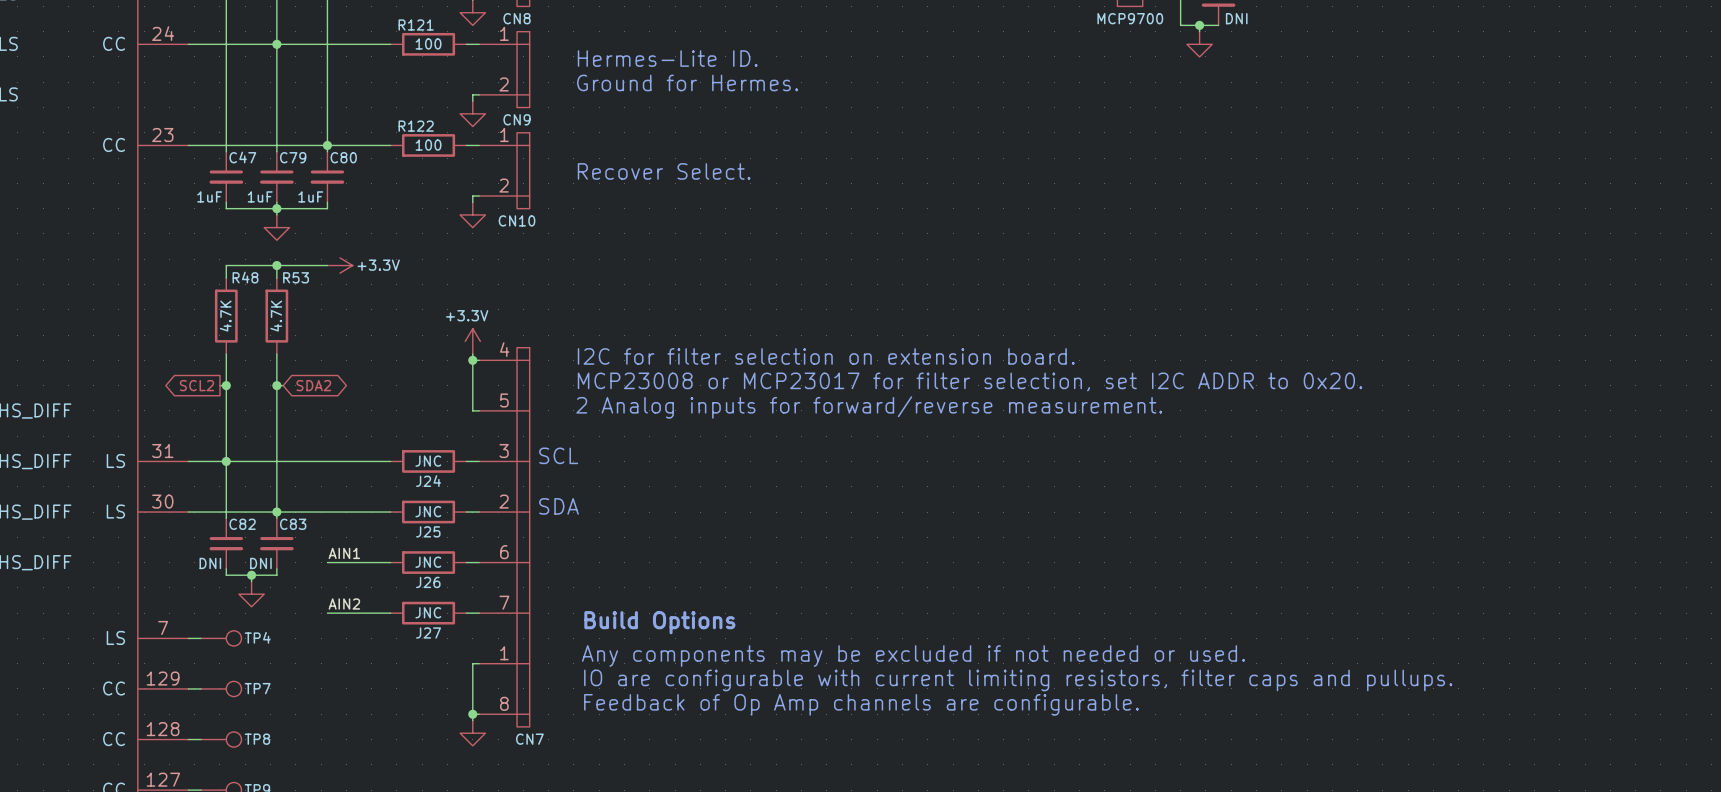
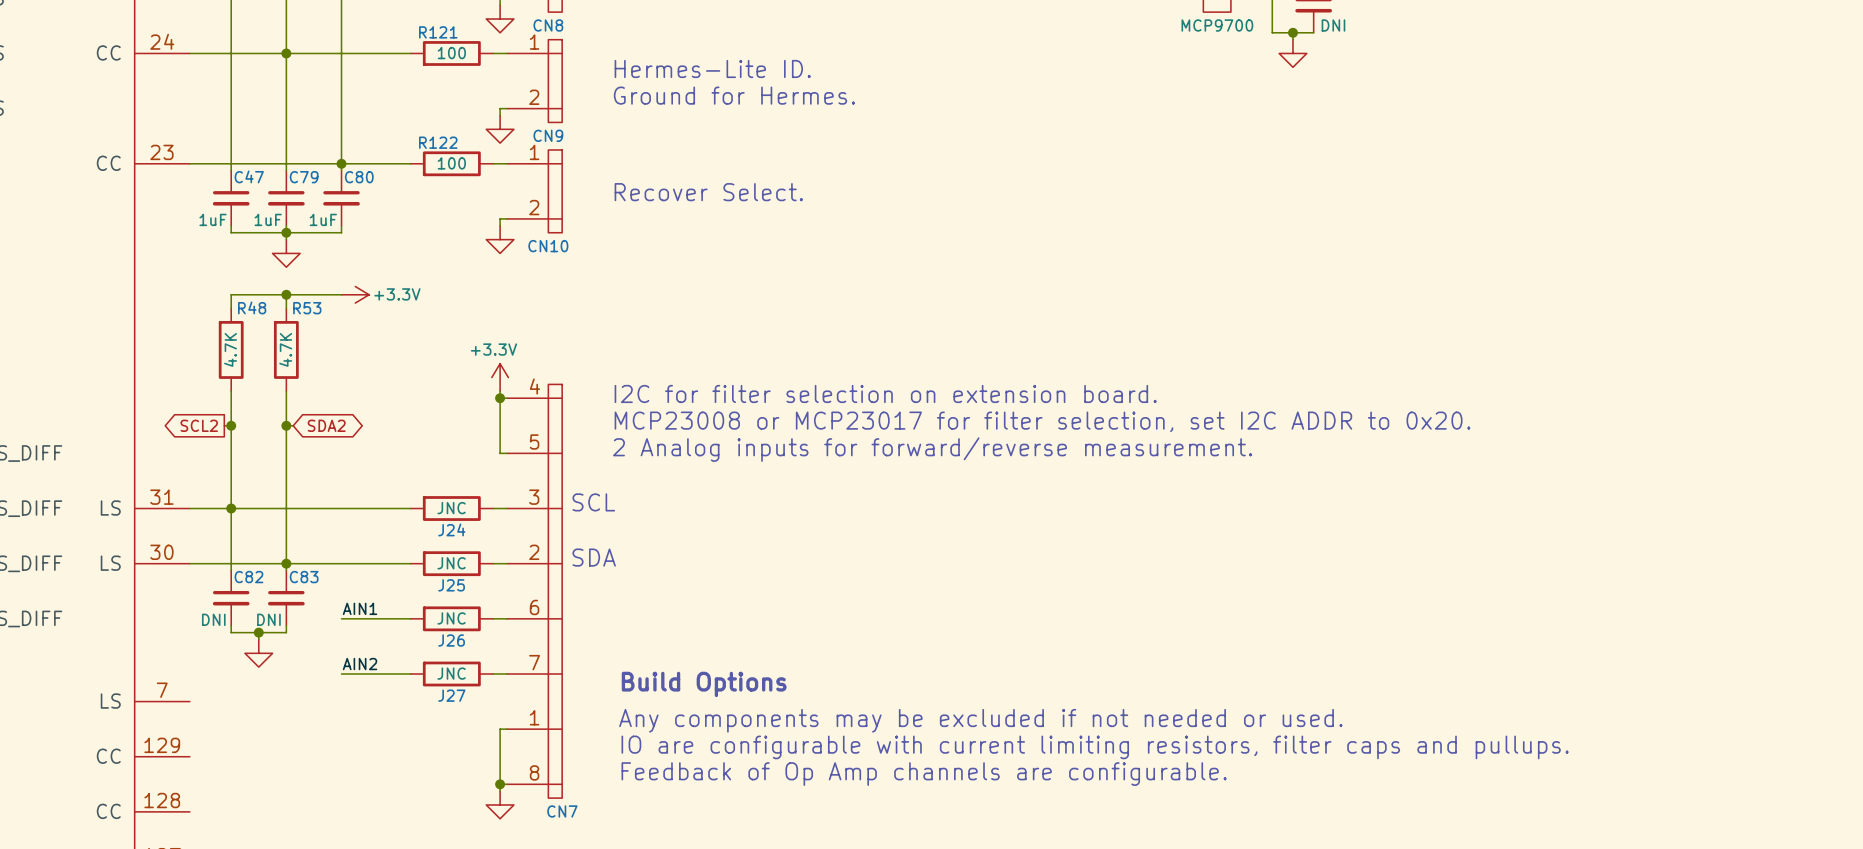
wire: (188, 638) (201, 638) -> none
TP4: (221, 638) -> none
wire: (188, 688) (201, 688) -> none
TP7: (221, 688) -> none
wire: (188, 739) (201, 739) -> none
TP8: (221, 739) -> none

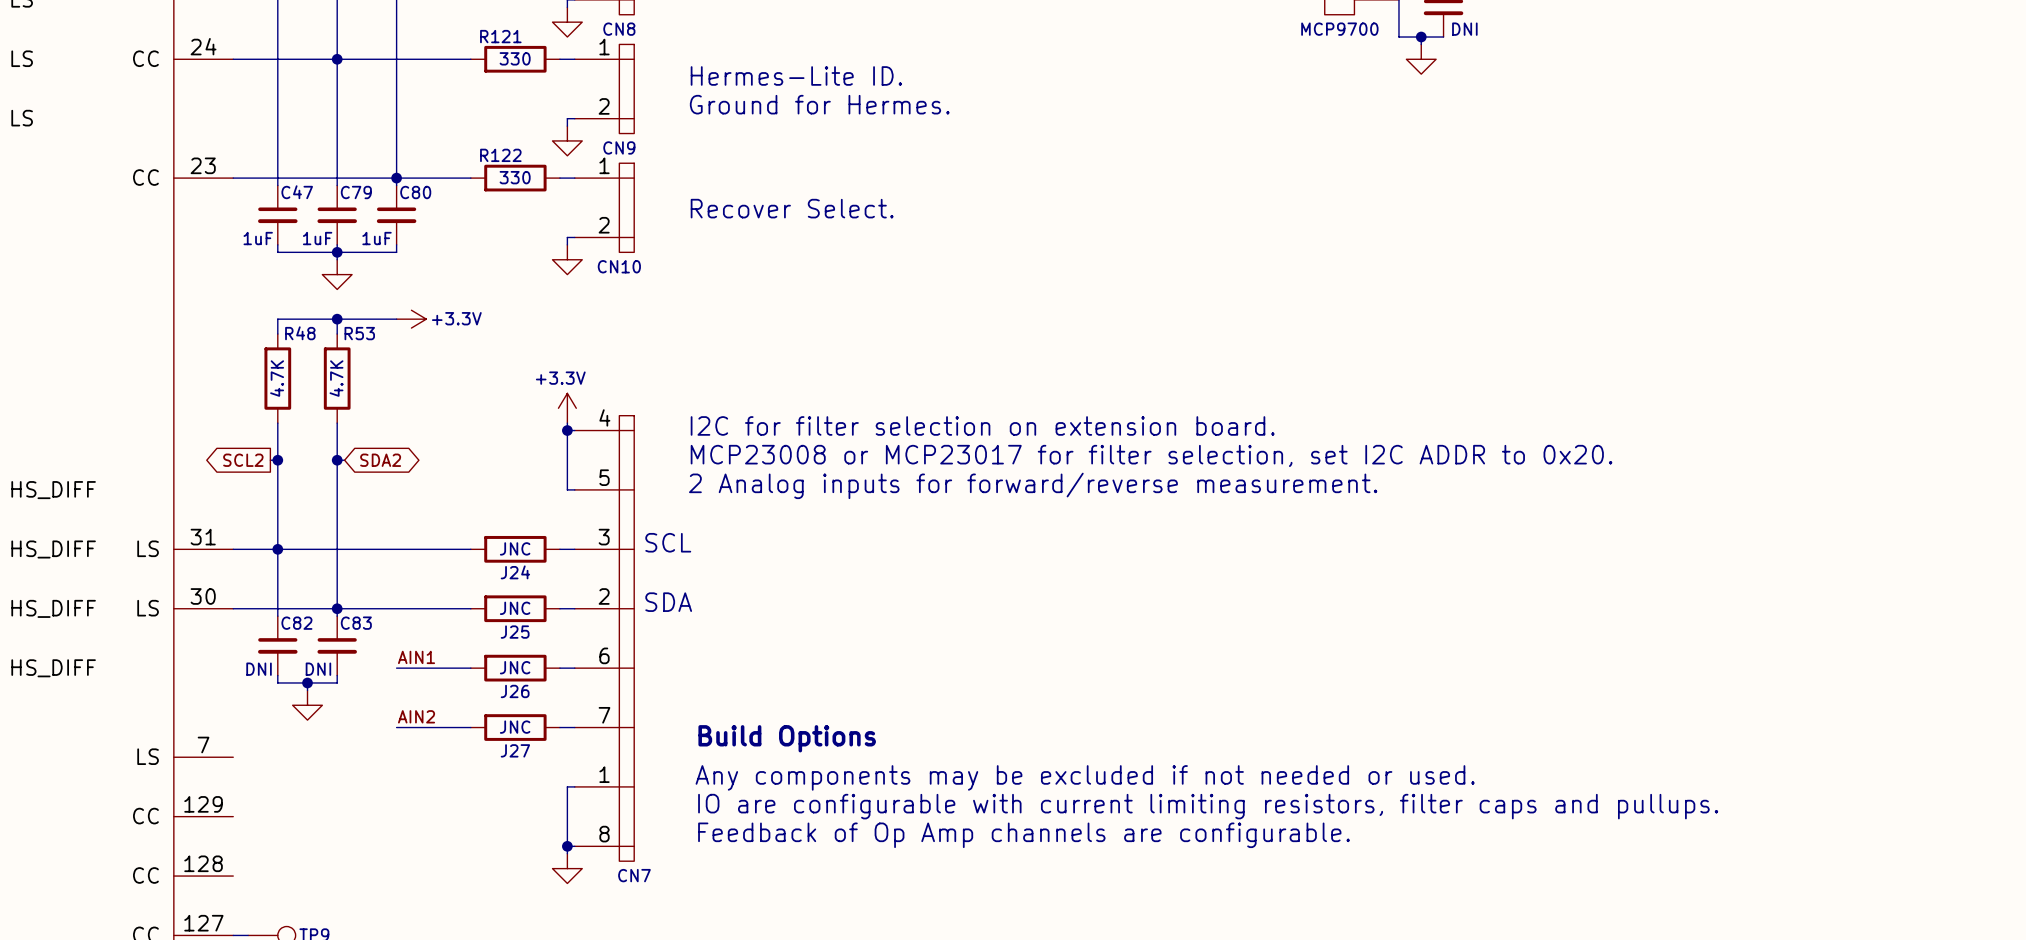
R121 value: 100 (451, 53) -> 330 (515, 58)
R122 value: 100 (451, 163) -> 330 (515, 177)

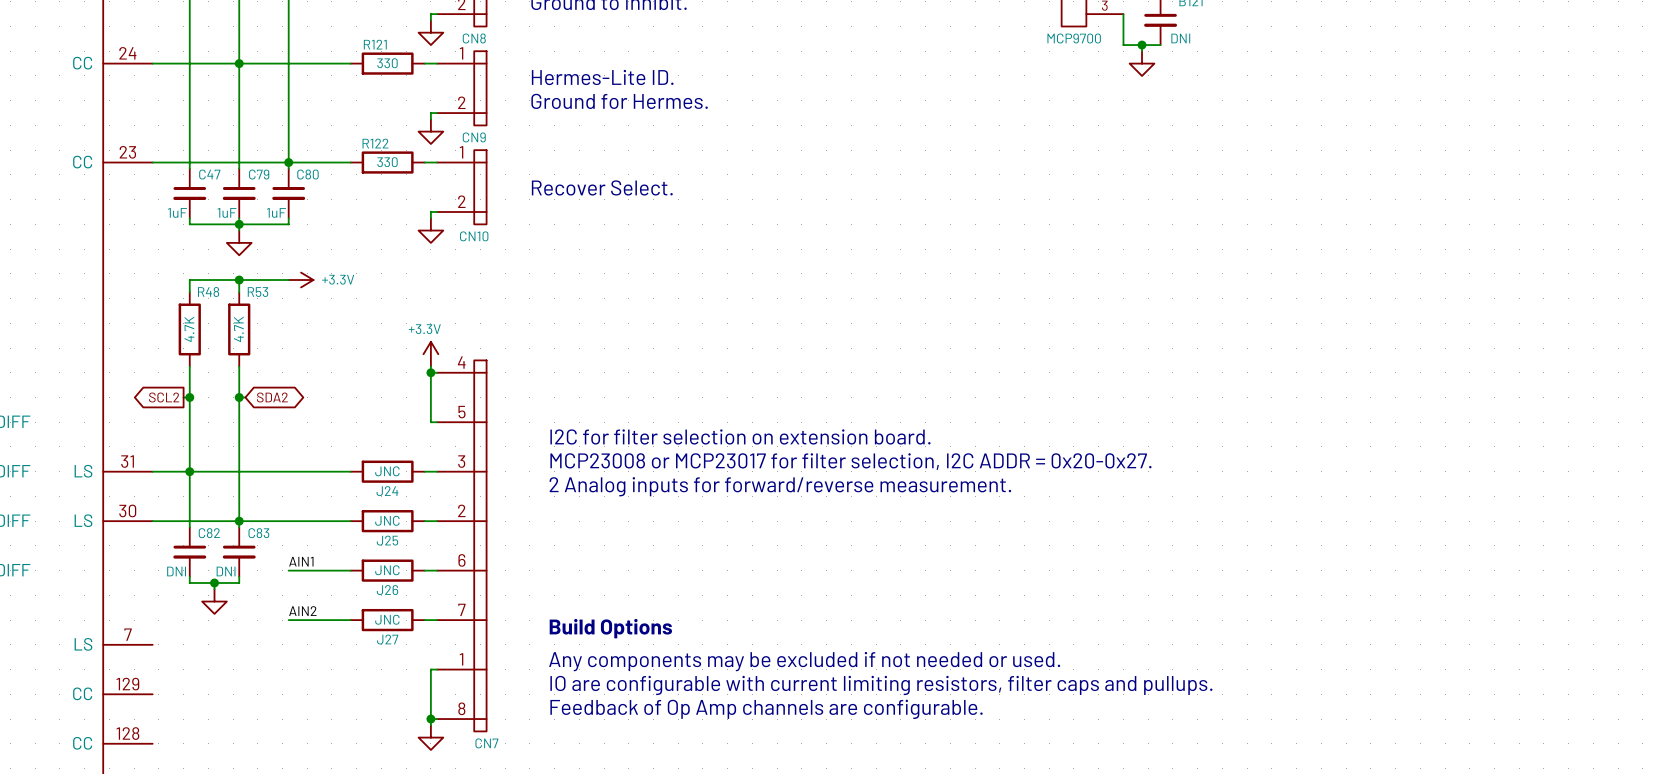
text position: I2C for filter selection on extension board. (982, 425) -> I2C for filter selection on extension board. (740, 436)
text: MCP23008 or MCP23017 for filter selection, set I2C ADDR to 0x20. (1151, 455) -> none
text position: 2 Analog inputs for forward/reverse measurement. (1033, 485) -> 2 Analog inputs for forward/reverse measurement. (780, 486)
text: none -> MCP23008 or MCP23017 for filter selection, I2C ADDR = 0x20-0x27. (850, 461)
text: SCL (668, 542) -> none
text: SDA (668, 602) -> none
text position: Build Options (787, 738) -> Build Options (610, 628)
text position: Any components may be excluded if not needed or used. (1085, 777) -> Any components may be excluded if not needed or used. (804, 661)
text position: IO are configurable with current limiting resistors, filter caps and pullups. (1208, 806) -> IO are configurable with current limiting resistors, filter caps and pullups. (881, 685)
text position: Feedback of Op Amp channels are configurable. (1024, 835) -> Feedback of Op Amp channels are configurable. (766, 709)

